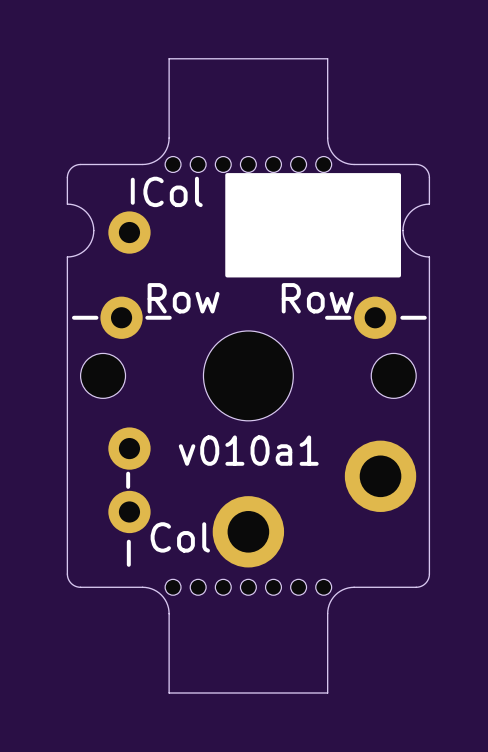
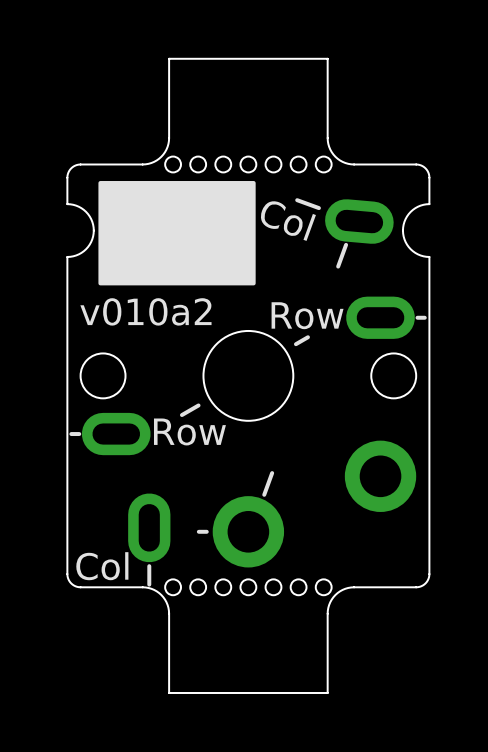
drawing: [225, 173, 401, 278] -> none
line: (132, 179) (132, 202) -> none
drawing: none -> [98, 181, 256, 286]
line: none -> (297, 200) (318, 208)
part: none -> (359, 221)
part: (129, 232) -> none
line: none -> (346, 244) (338, 266)
part footprint: [354, 296, 397, 339] -> [346, 296, 415, 339]
text: none -> v010a2 (145, 311)
line: (96, 317) (73, 317) -> none
part: (121, 317) -> none
line: (169, 317) (147, 317) -> none
line: (349, 317) (327, 317) -> none
line: (417, 317) (402, 317) -> none
line: none -> (307, 337) (295, 344)
line: none -> (198, 405) (181, 415)
part footprint: [108, 427, 151, 470] -> [81, 412, 151, 456]
line: none -> (79, 434) (71, 434)
text: v010a1 (248, 450) -> none
line: (128, 473) (128, 486) -> none
line: none -> (272, 473) (264, 494)
part footprint: [108, 490, 151, 534] -> [128, 493, 171, 563]
line: none -> (206, 531) (198, 531)
line: (128, 541) (128, 564) -> none
line: none -> (149, 566) (149, 584)

